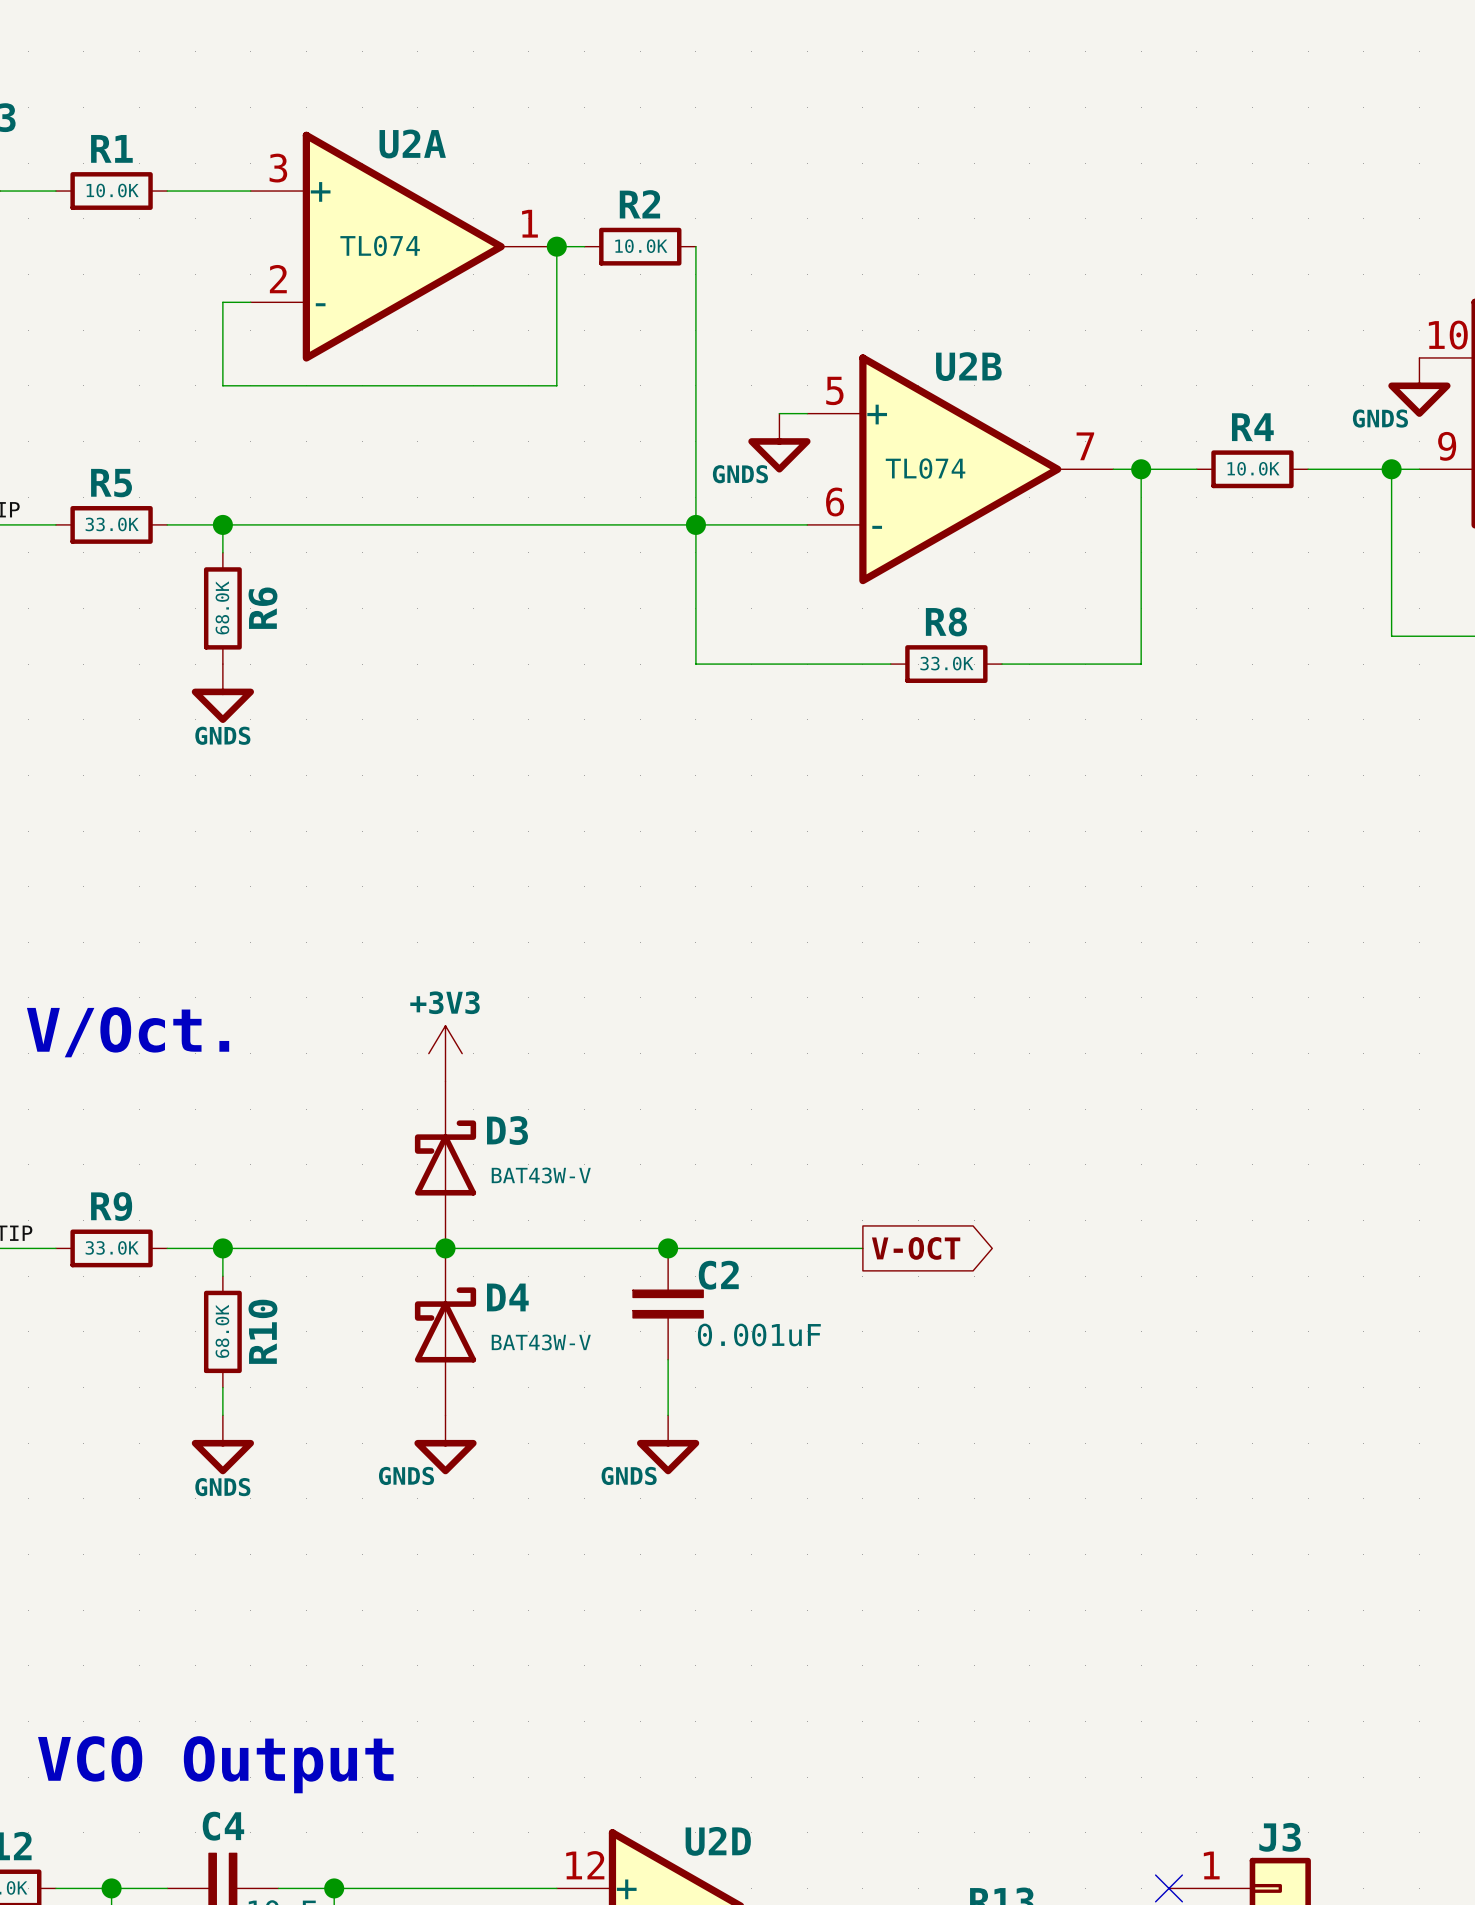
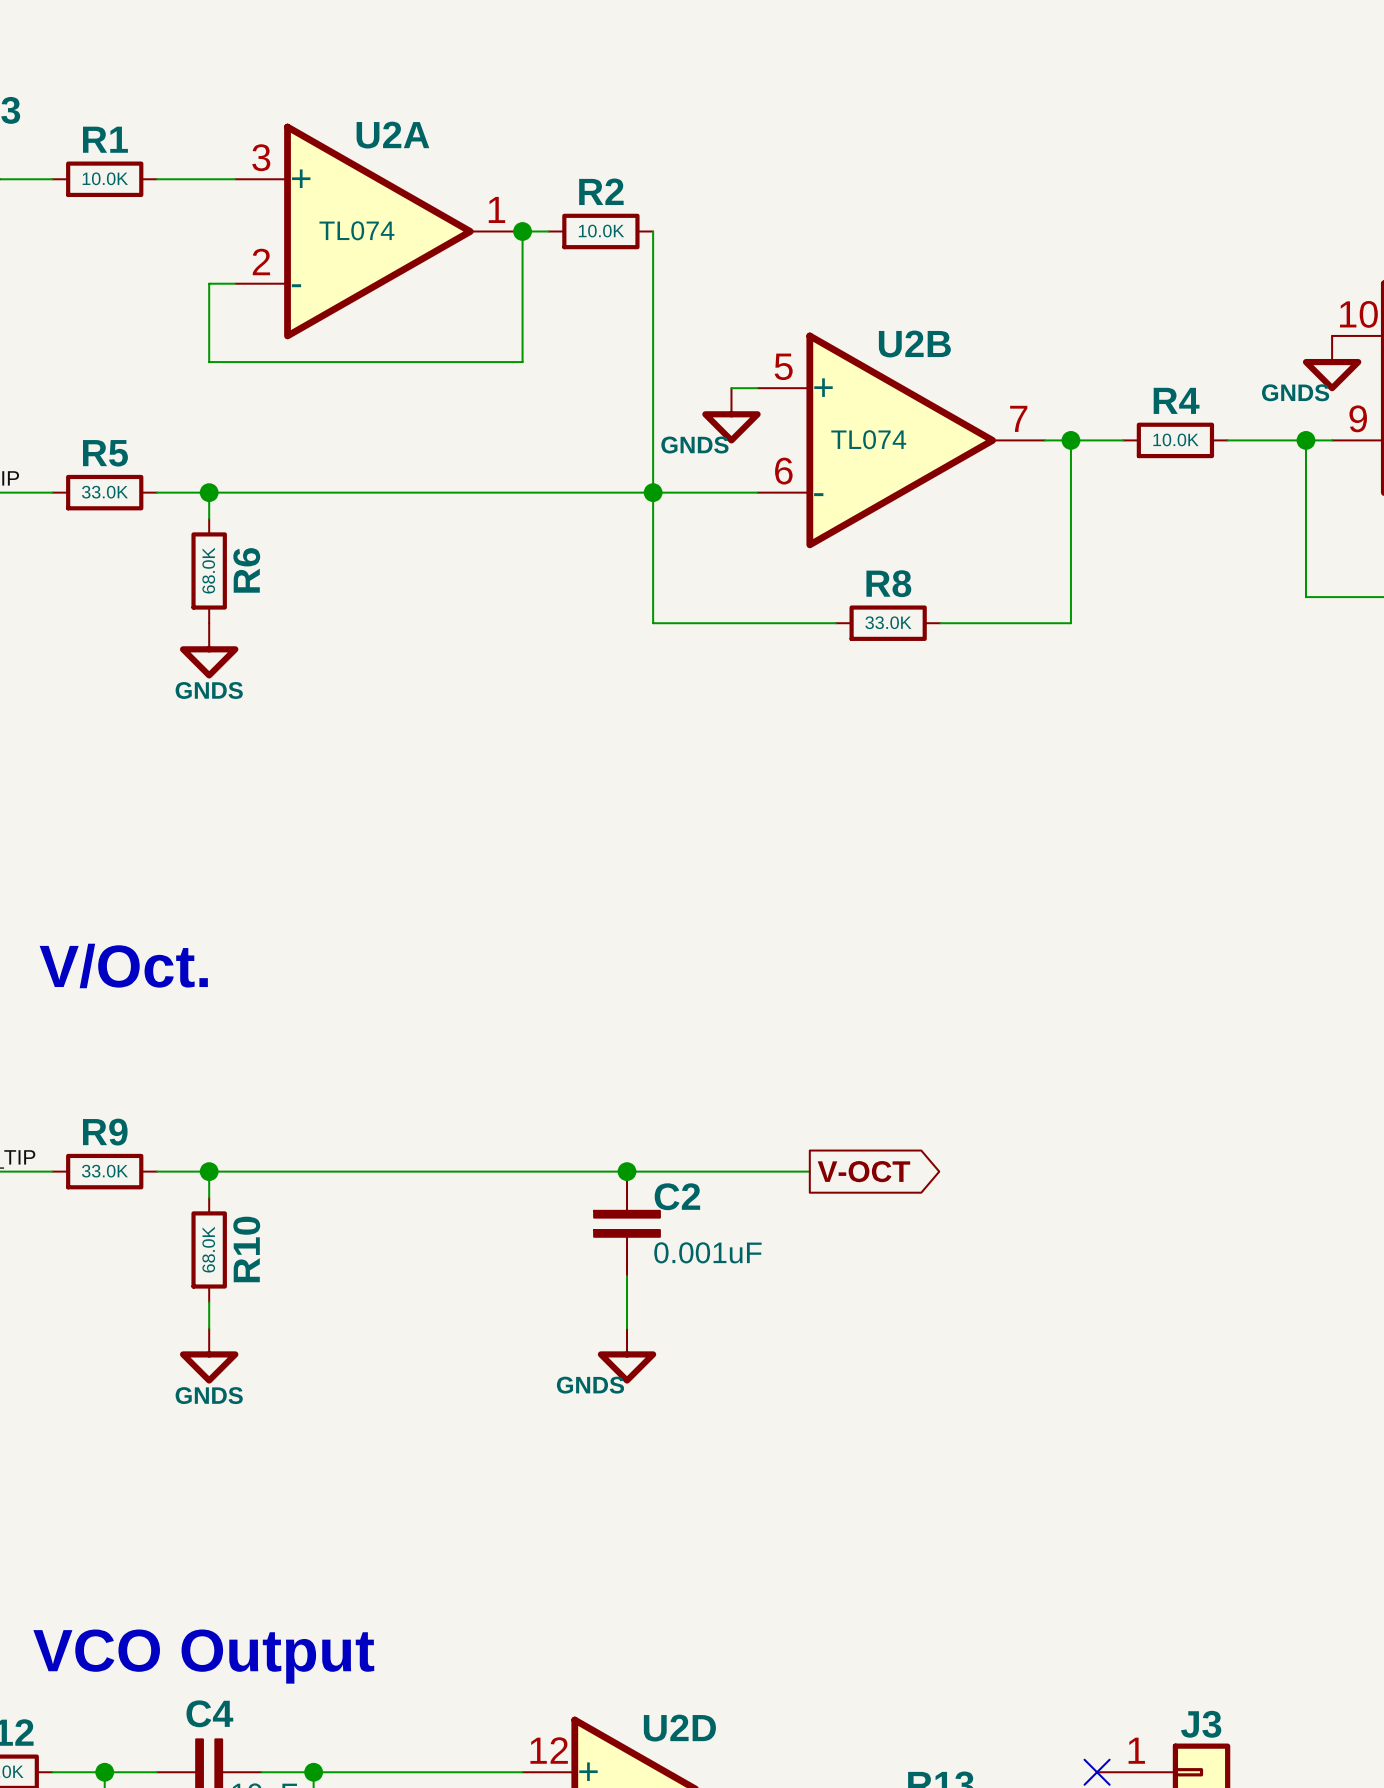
power symbol: +3V3 (445, 1053) -> none
D3: BAT43W-V (445, 1164) -> none
junction: (445, 1248) -> none
D4: BAT43W-V (445, 1331) -> none
power symbol: GNDS (445, 1444) -> none

